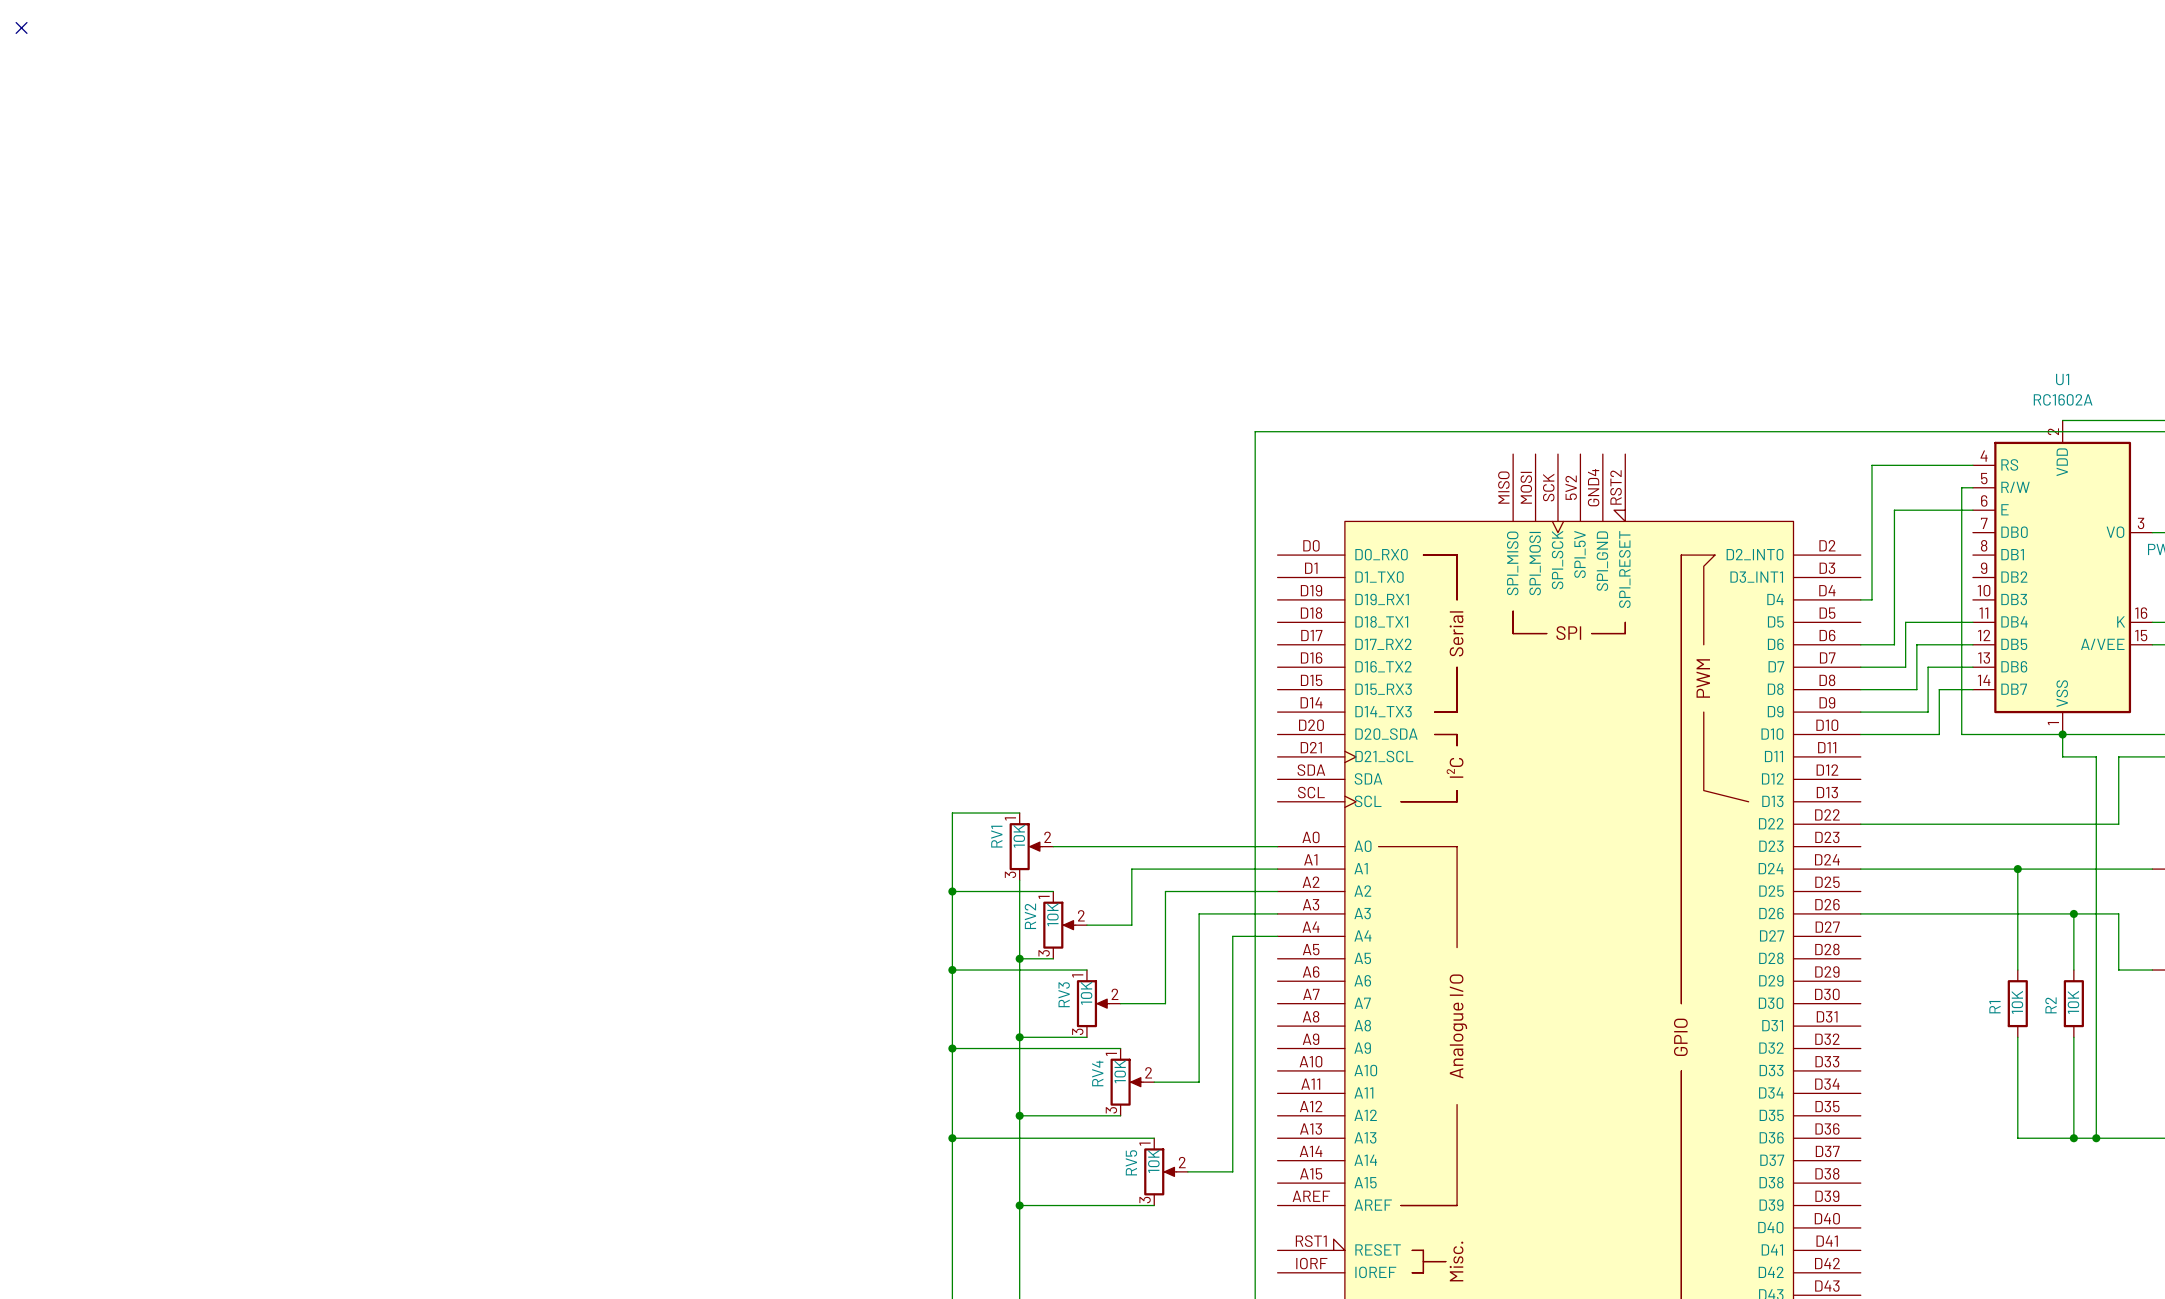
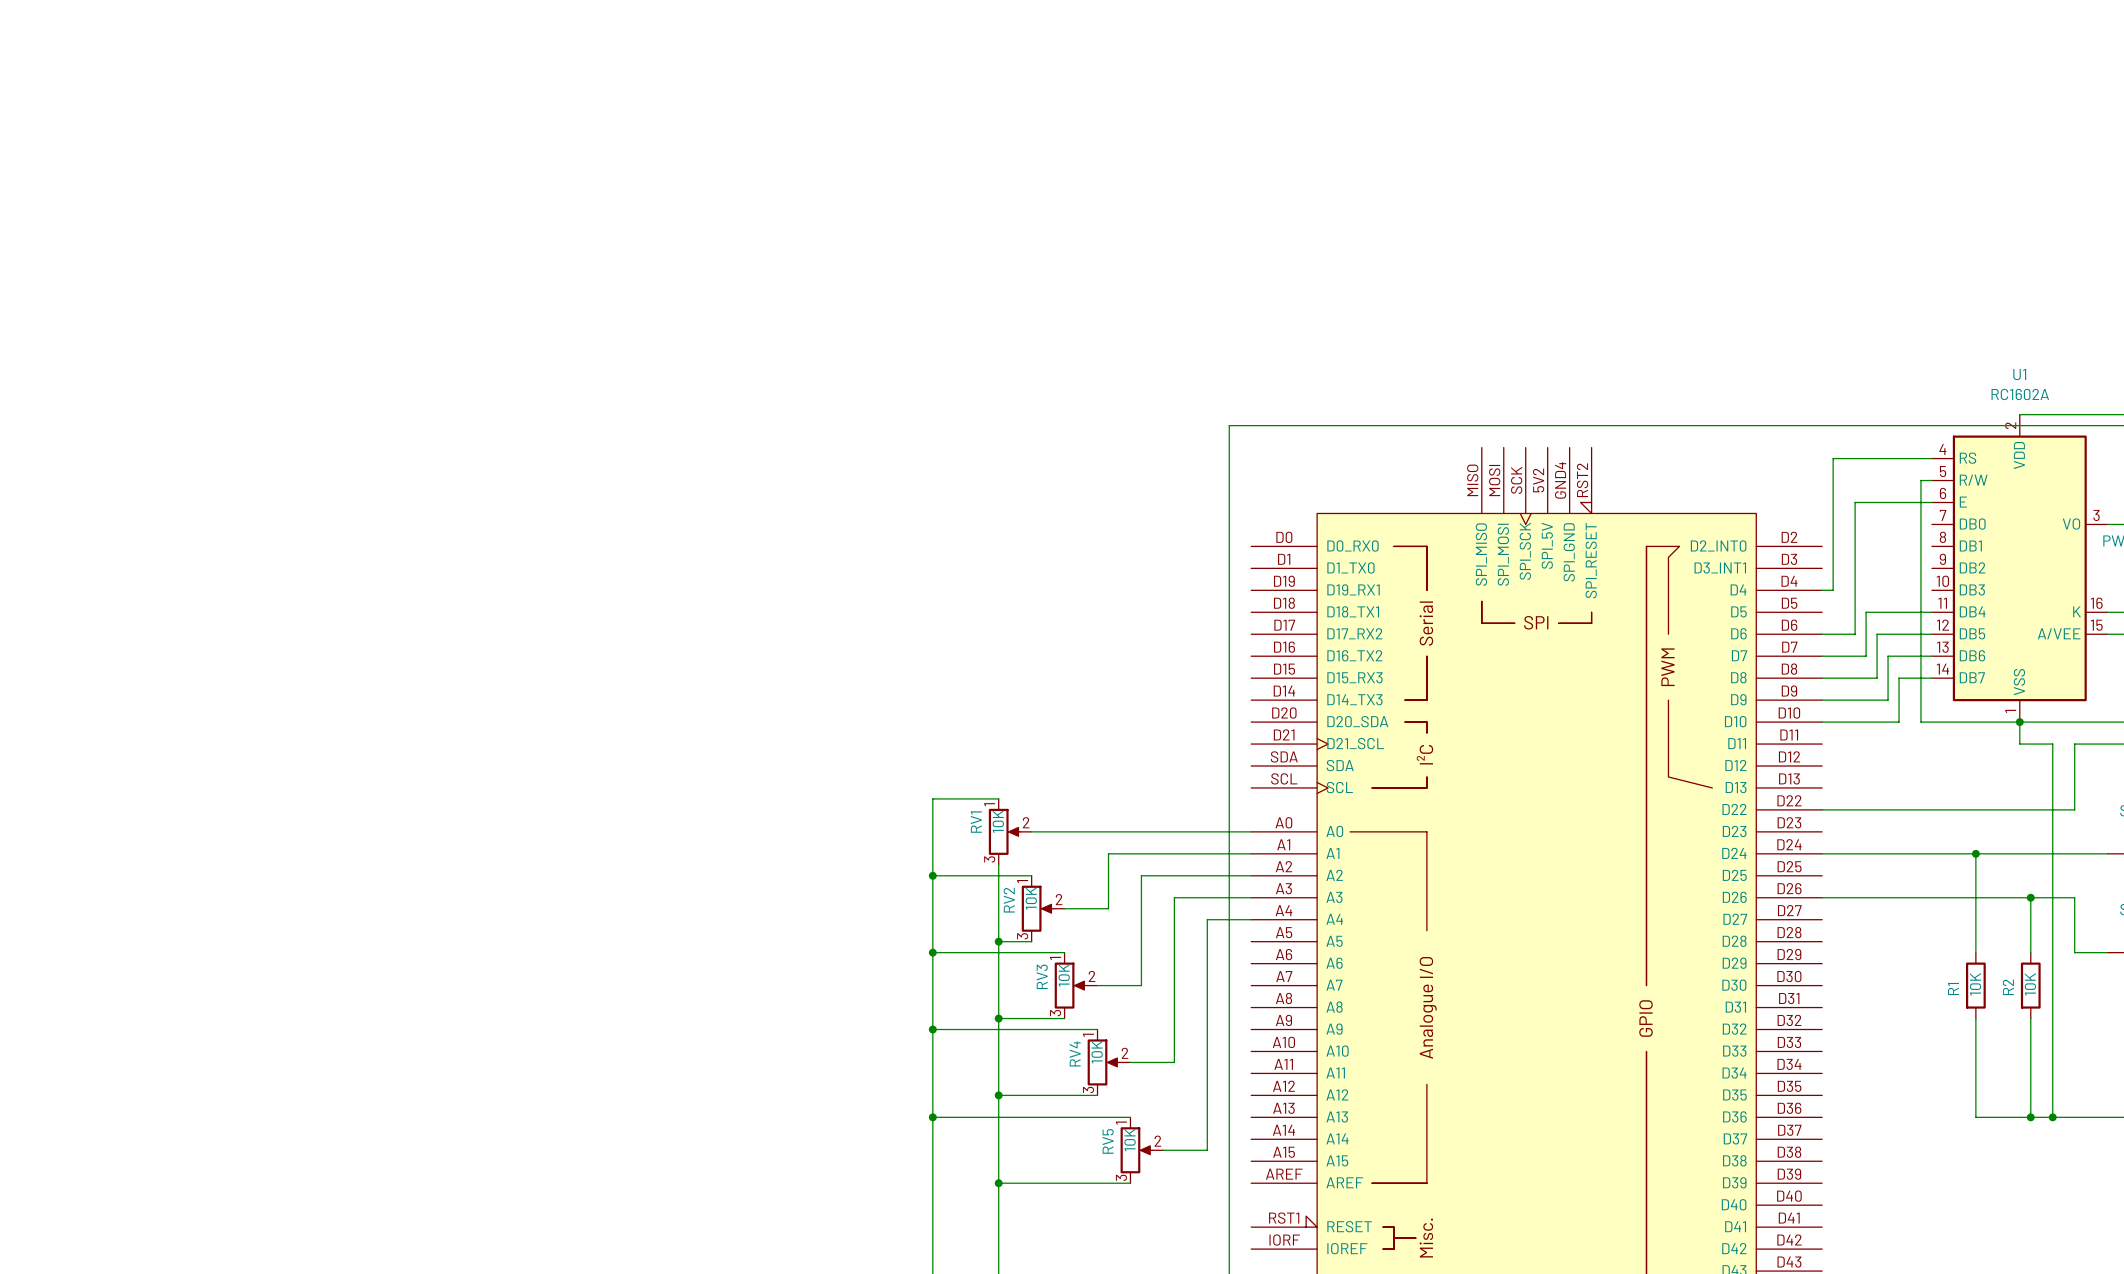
no-connect mark: (21, 27) -> none

